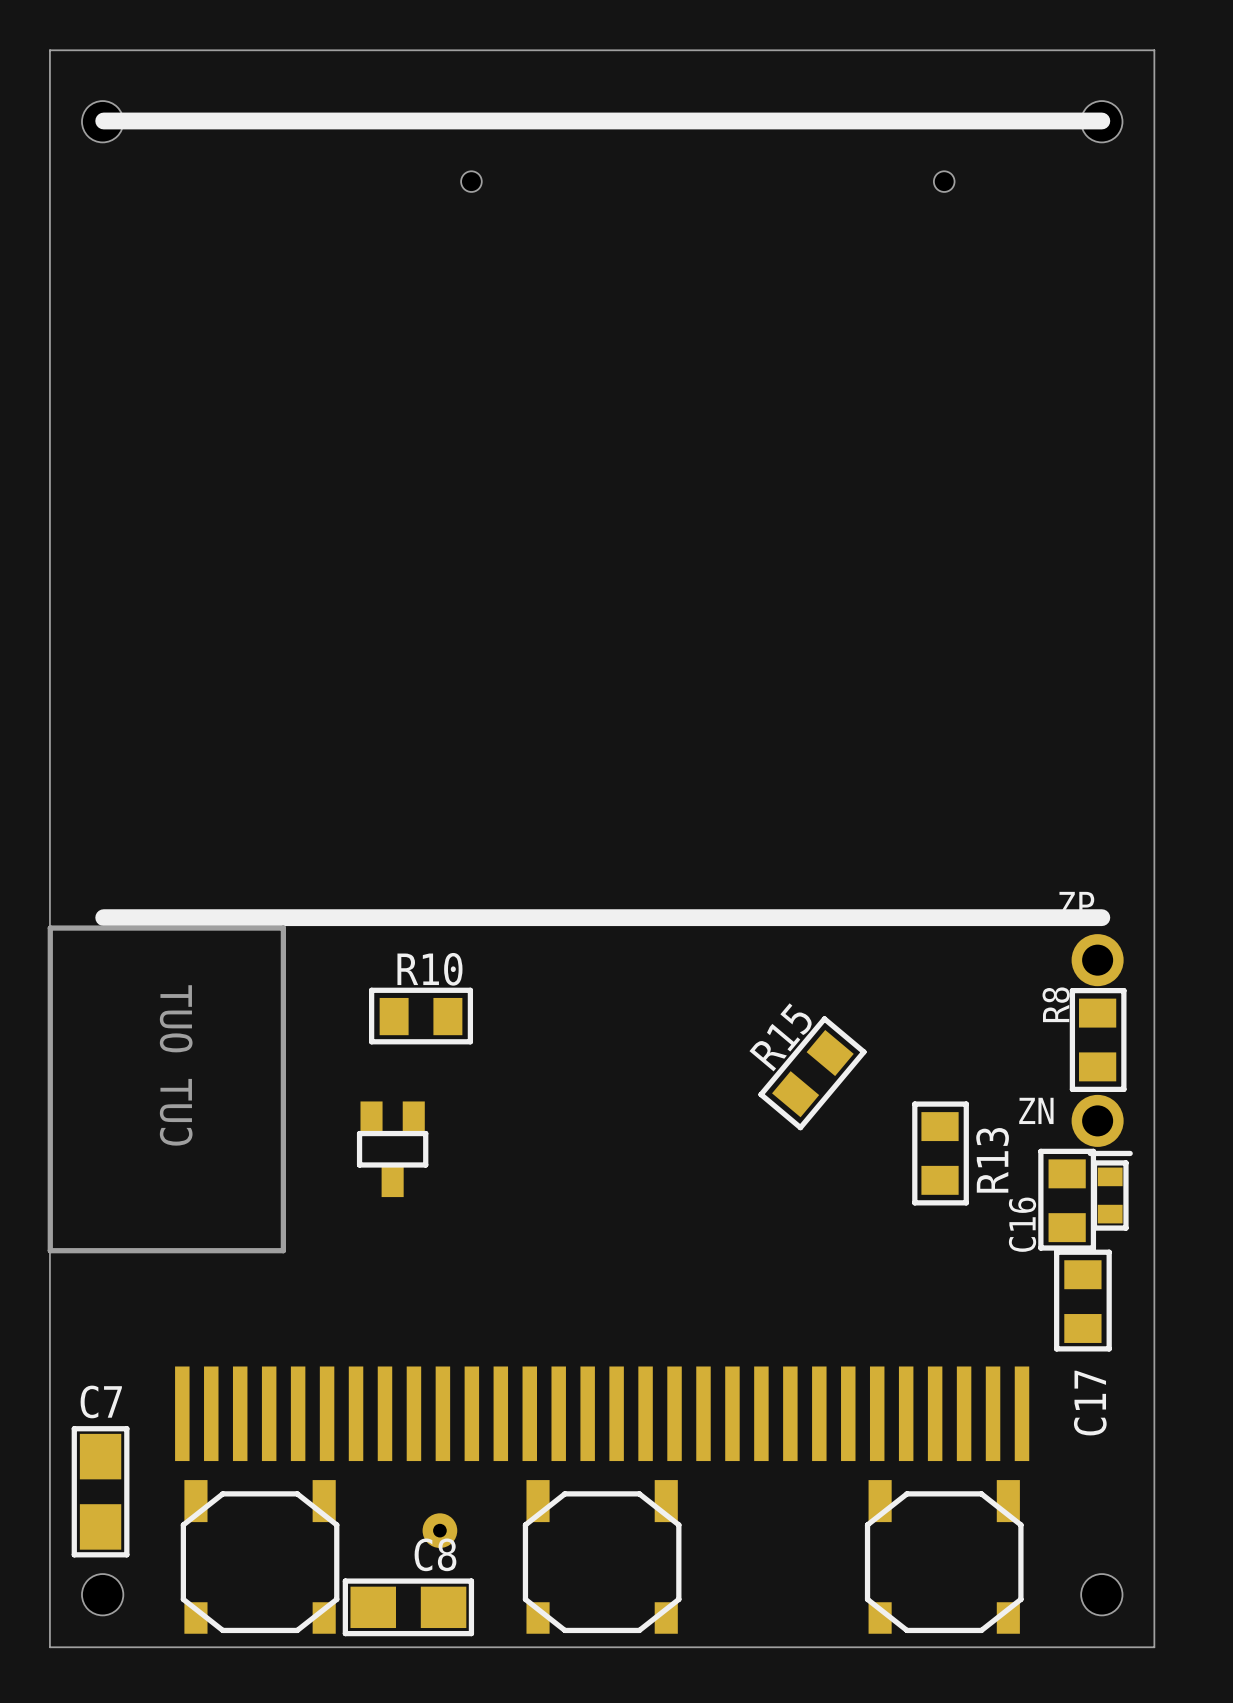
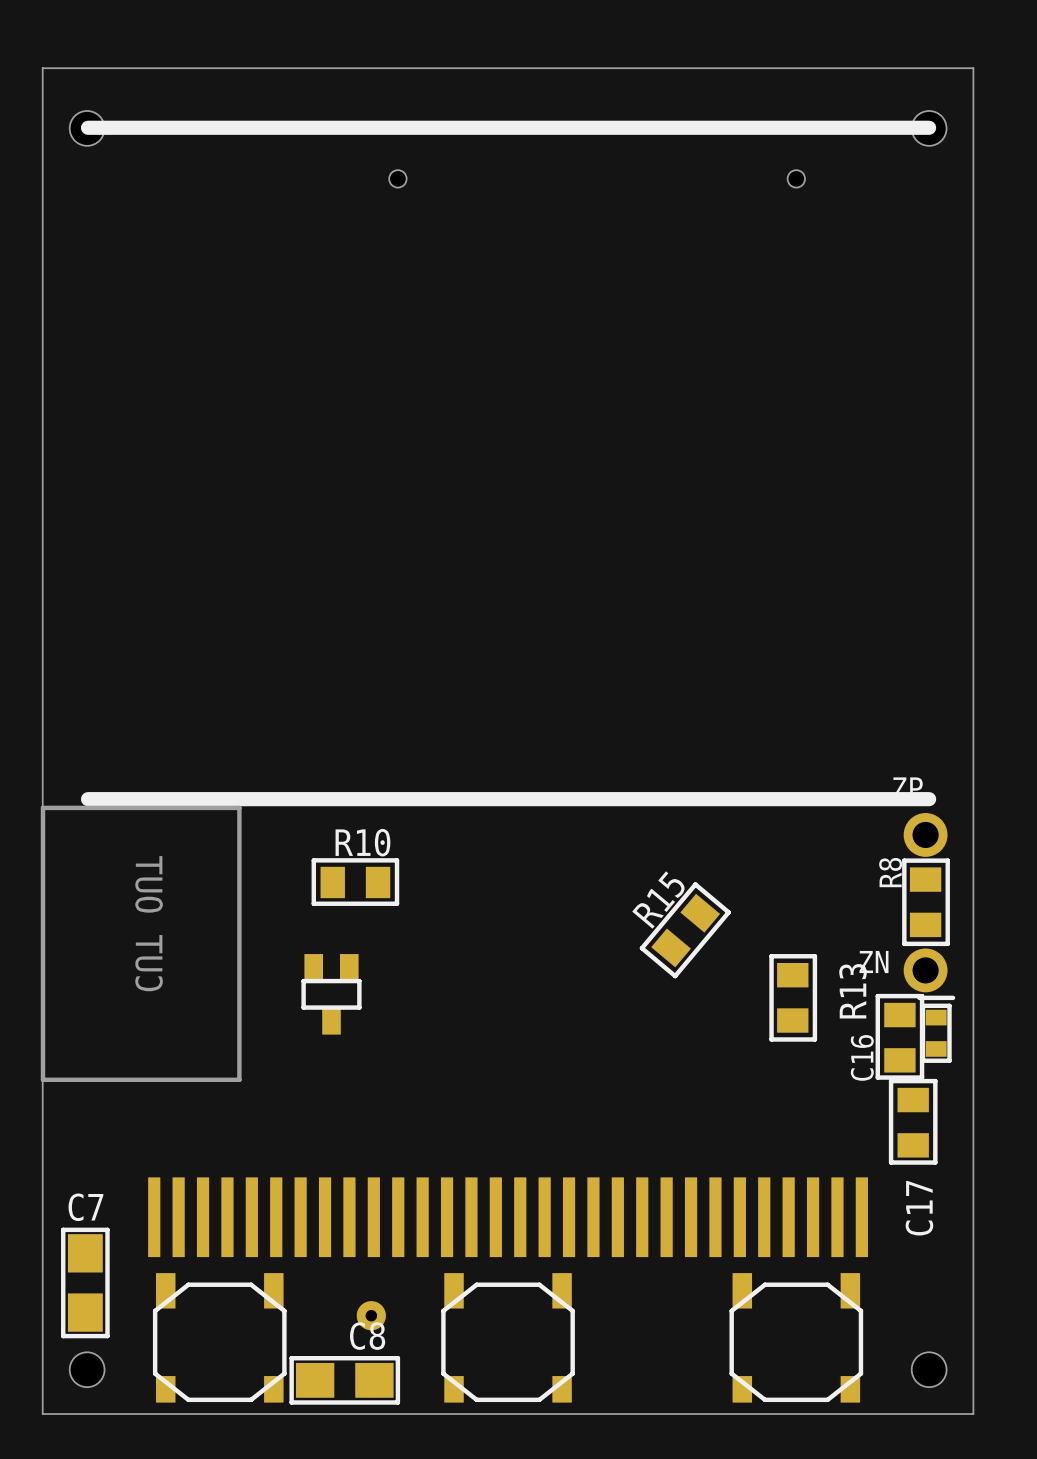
R13 name position: R13 (992, 1160) -> R13 (853, 991)

